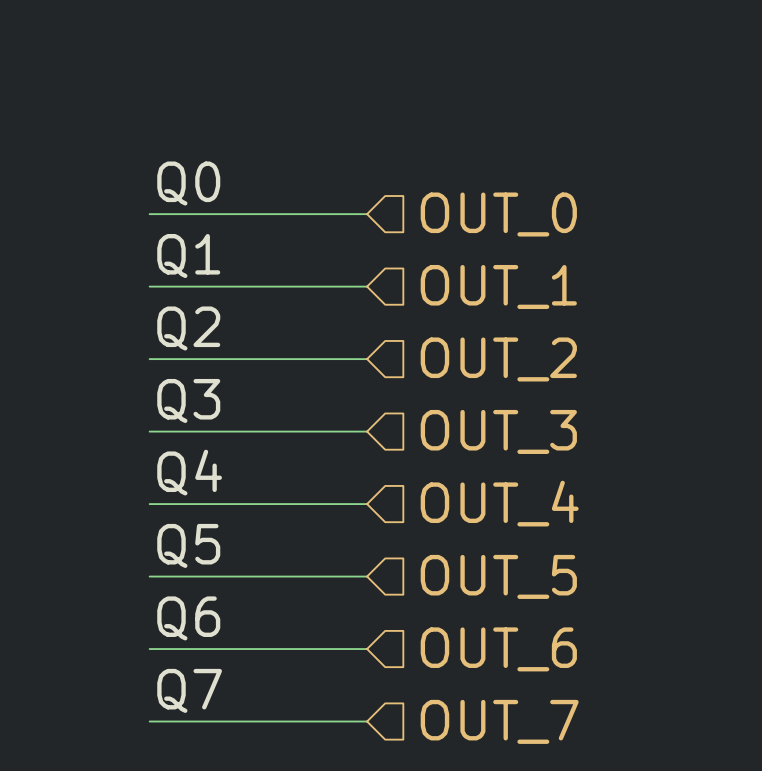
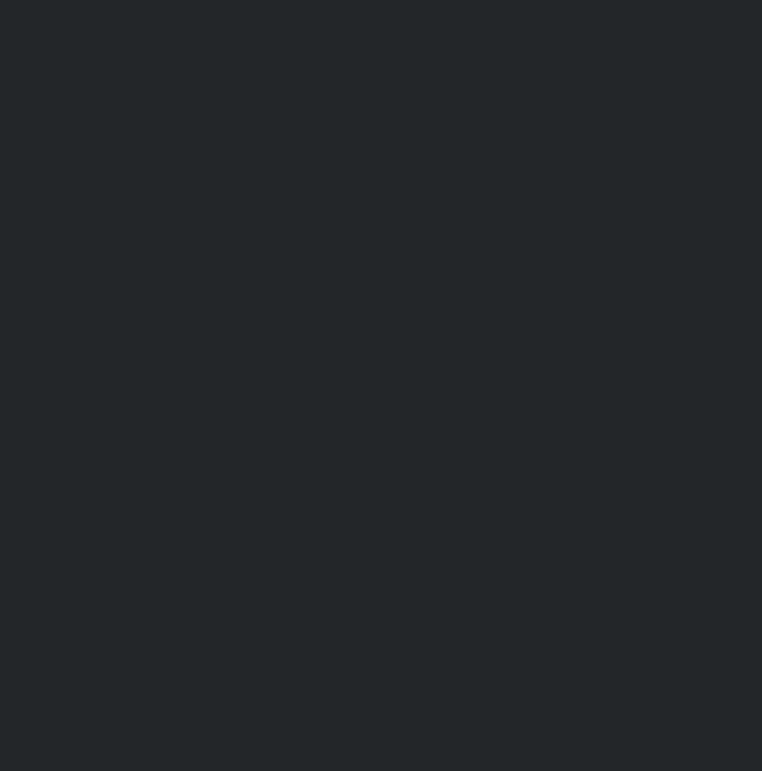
label: Q0 (188, 183) -> none
wire: (149, 214) (367, 214) -> none
hierarchical label: OUT_0 (498, 214) -> none
label: Q1 (188, 256) -> none
wire: (149, 286) (367, 286) -> none
hierarchical label: OUT_1 (498, 286) -> none
label: Q2 (188, 328) -> none
wire: (149, 359) (367, 359) -> none
hierarchical label: OUT_2 (498, 359) -> none
label: Q3 (188, 400) -> none
wire: (149, 431) (367, 431) -> none
hierarchical label: OUT_3 (498, 431) -> none
label: Q4 (189, 472) -> none
hierarchical label: OUT_4 (499, 503) -> none
wire: (149, 504) (367, 504) -> none
label: Q5 (188, 545) -> none
wire: (149, 576) (367, 576) -> none
hierarchical label: OUT_5 (498, 576) -> none
label: Q6 (188, 618) -> none
wire: (149, 649) (367, 649) -> none
hierarchical label: OUT_6 (498, 649) -> none
label: Q7 (189, 690) -> none
wire: (149, 721) (367, 721) -> none
hierarchical label: OUT_7 (499, 721) -> none

